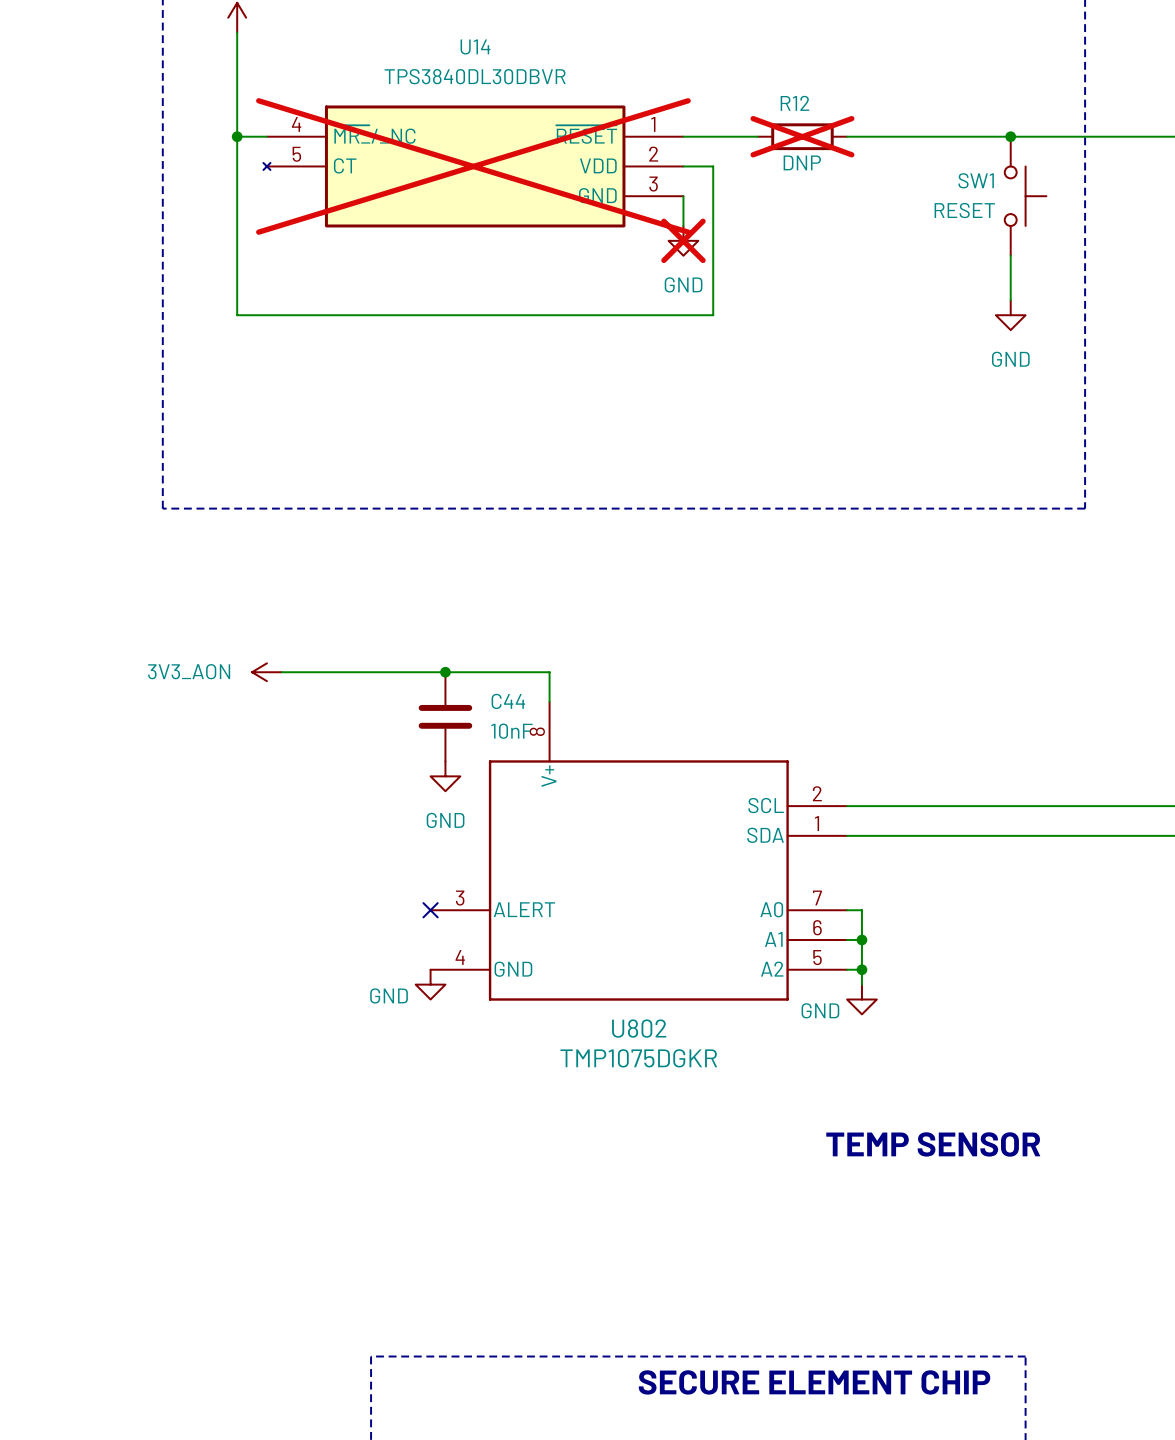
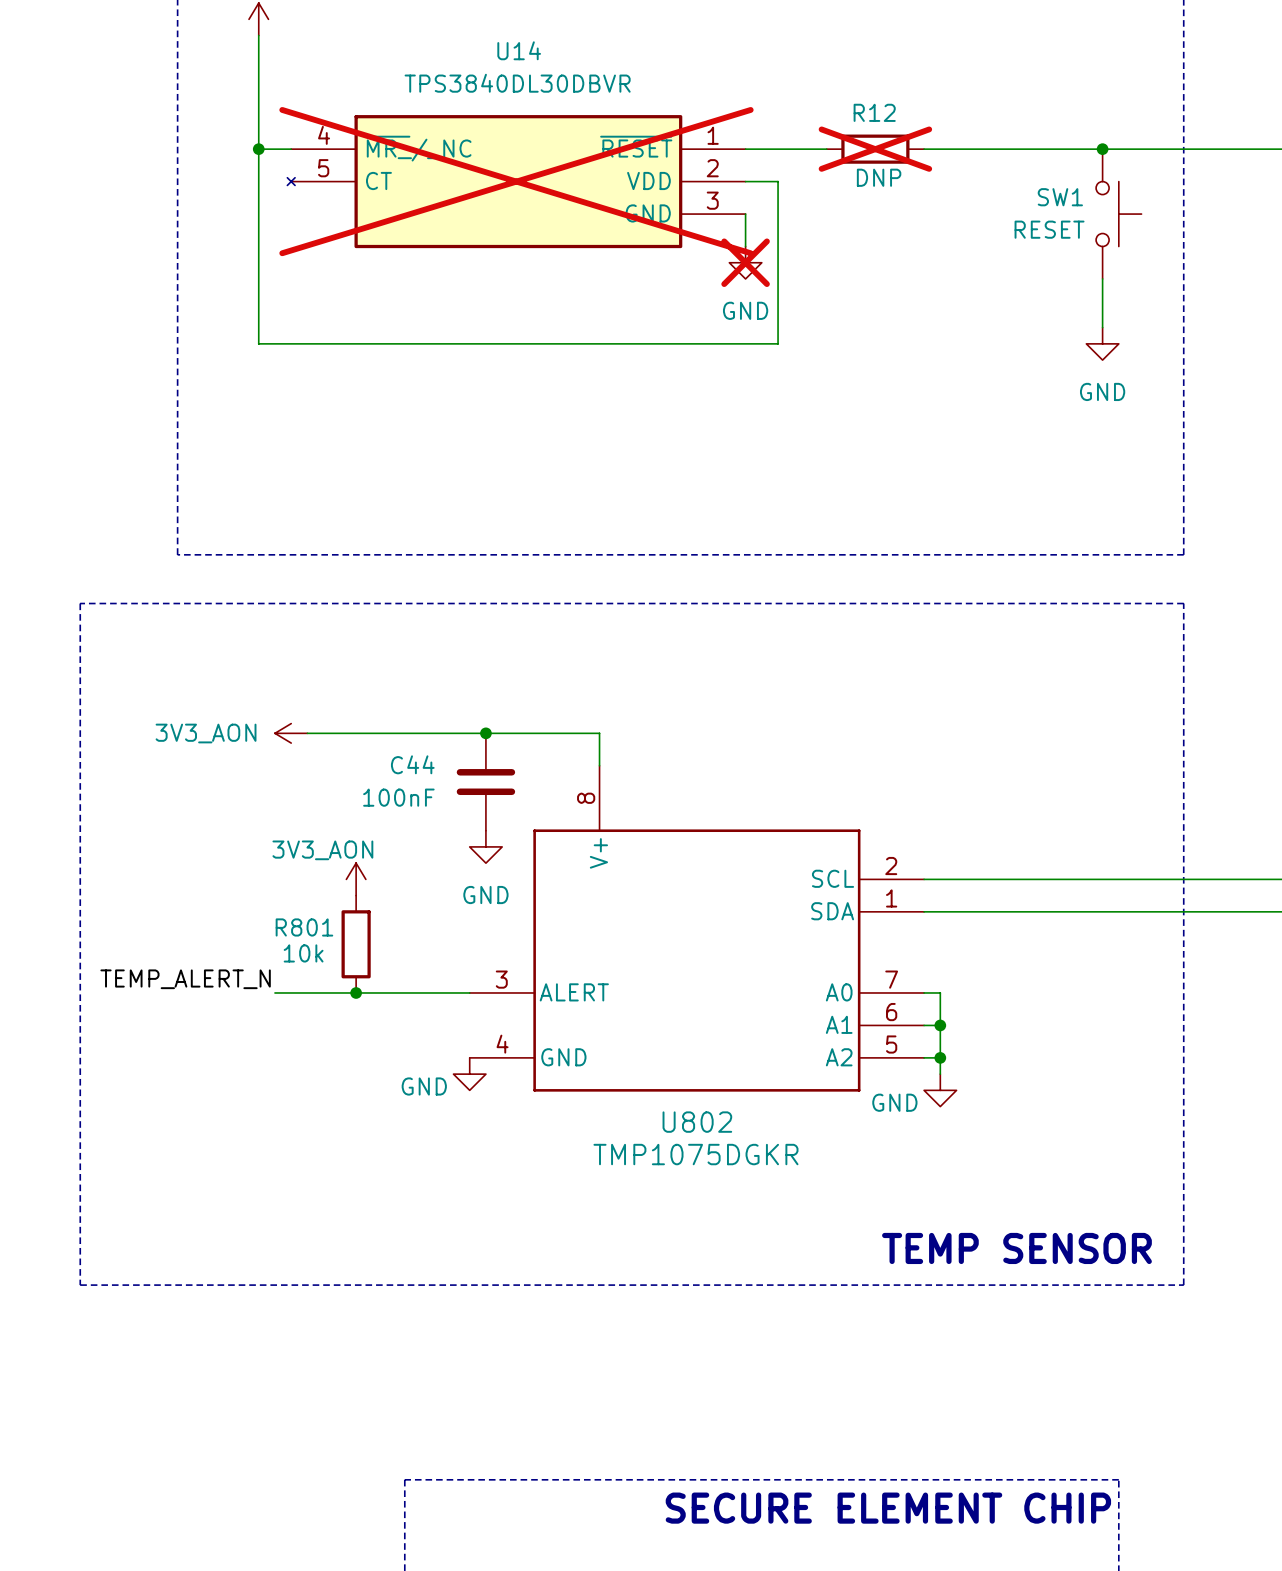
line: none -> (80, 603) (1183, 603) (1183, 1285) (80, 1285) (80, 603)
C44 name position: C44 (508, 701) -> C44 (412, 764)
C44 value: 10nF (511, 731) -> 100nF (398, 797)
power symbol: none -> 3V3_AON (356, 879)
R801: none -> 10k (356, 944)
label: none -> TEMP_ALERT_N (185, 979)
wire: none -> (274, 992) (469, 992)
junction: none -> (356, 992)
no-connect mark: (430, 910) -> none

